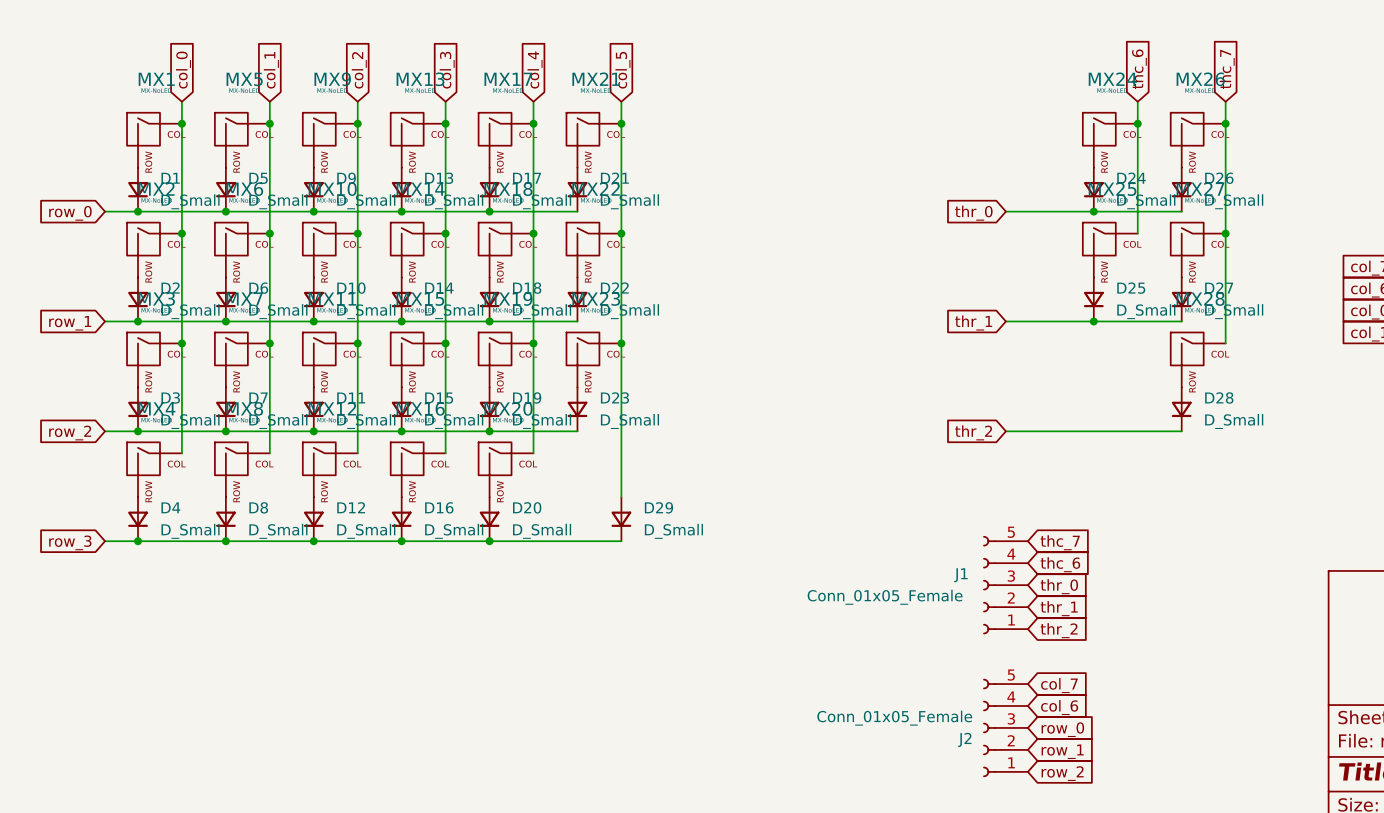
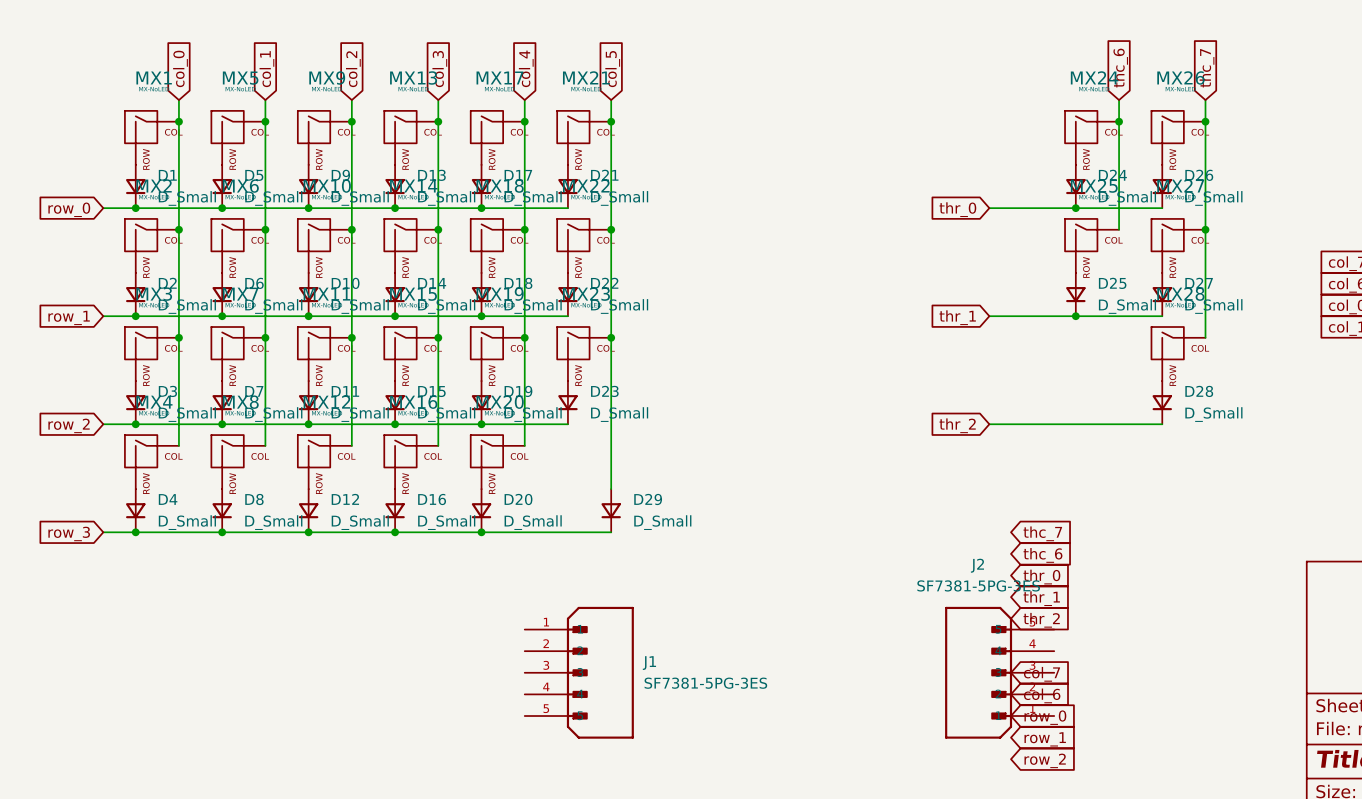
J1 symbol: [983, 536, 1028, 635] -> [524, 606, 634, 739]
J1 name position: J1 (960, 575) -> J1 (649, 663)
J1 value: Conn_01x05_Female (885, 597) -> SF7381-5PG-3ES (705, 683)
J2 symbol: [983, 678, 1028, 777] -> [945, 606, 1055, 739]
J2 value: Conn_01x05_Female (894, 718) -> SF7381-5PG-3ES (978, 585)
J2 name position: J2 (964, 739) -> J2 (977, 565)

